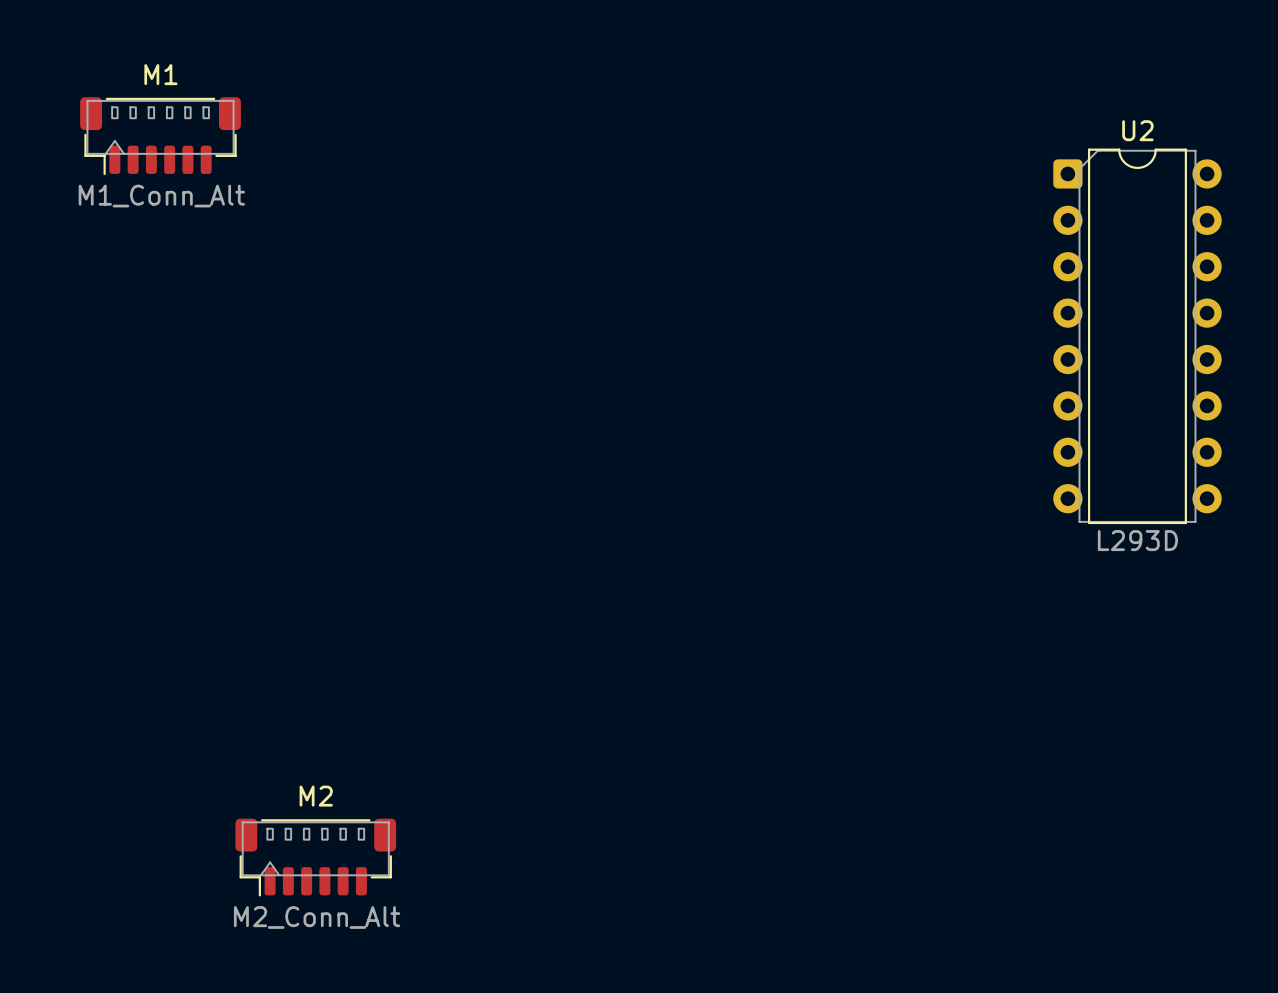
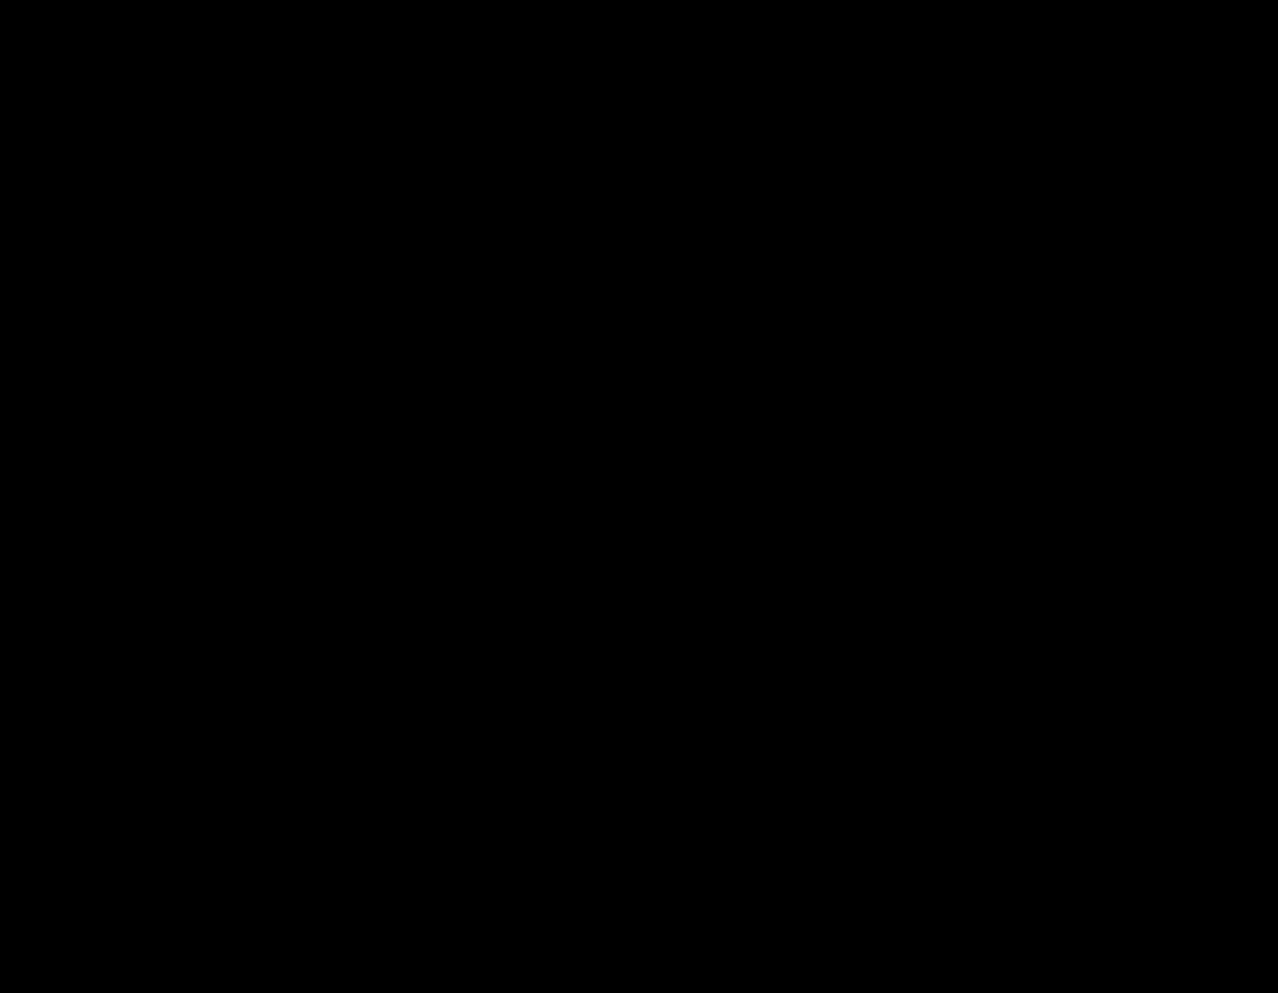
M1: M1_Conn_Alt (160, 136) -> none
U2: L293D (1137, 336) -> none
M2: M2_Conn_Alt (315, 857) -> none

